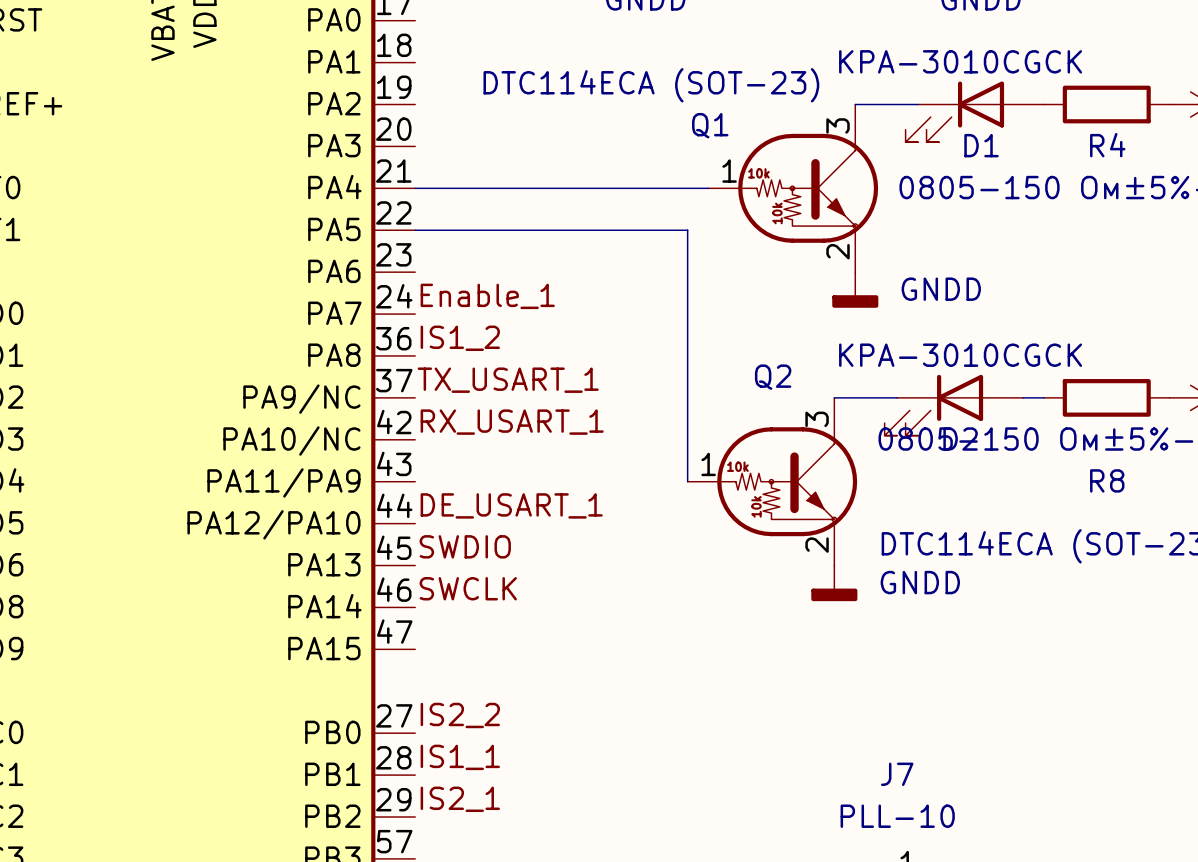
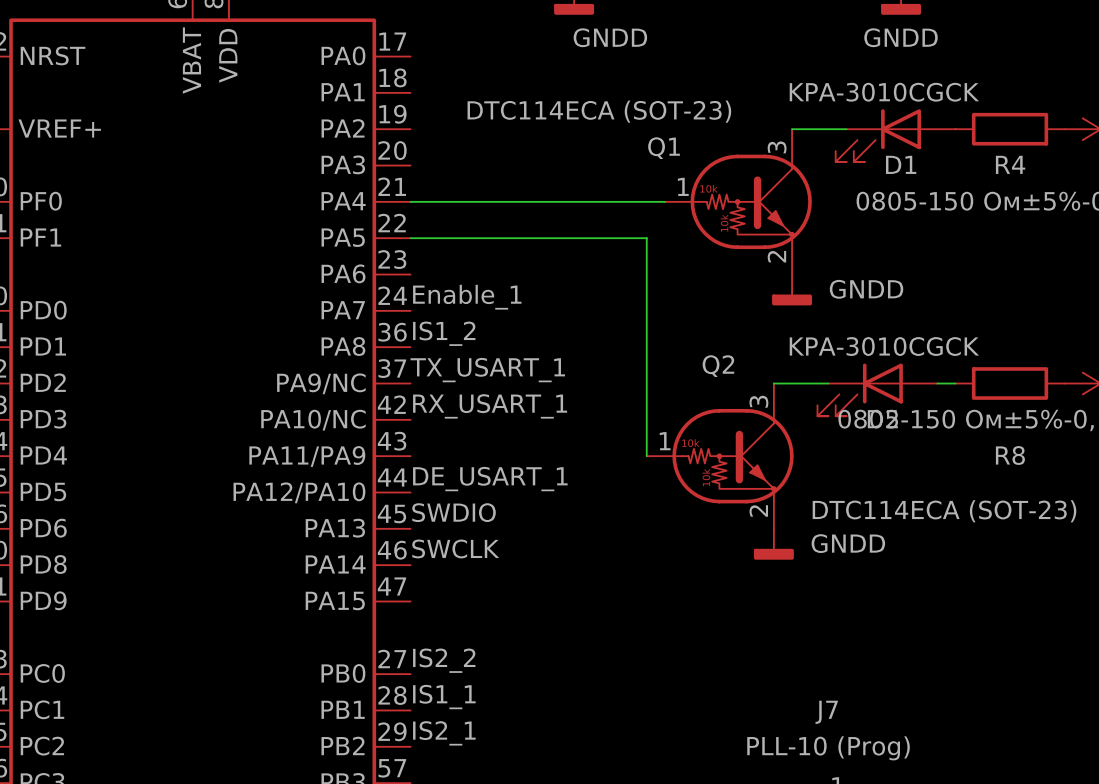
J7 value: PLL-10 (897, 816) -> PLL-10 (Prog) (828, 748)

